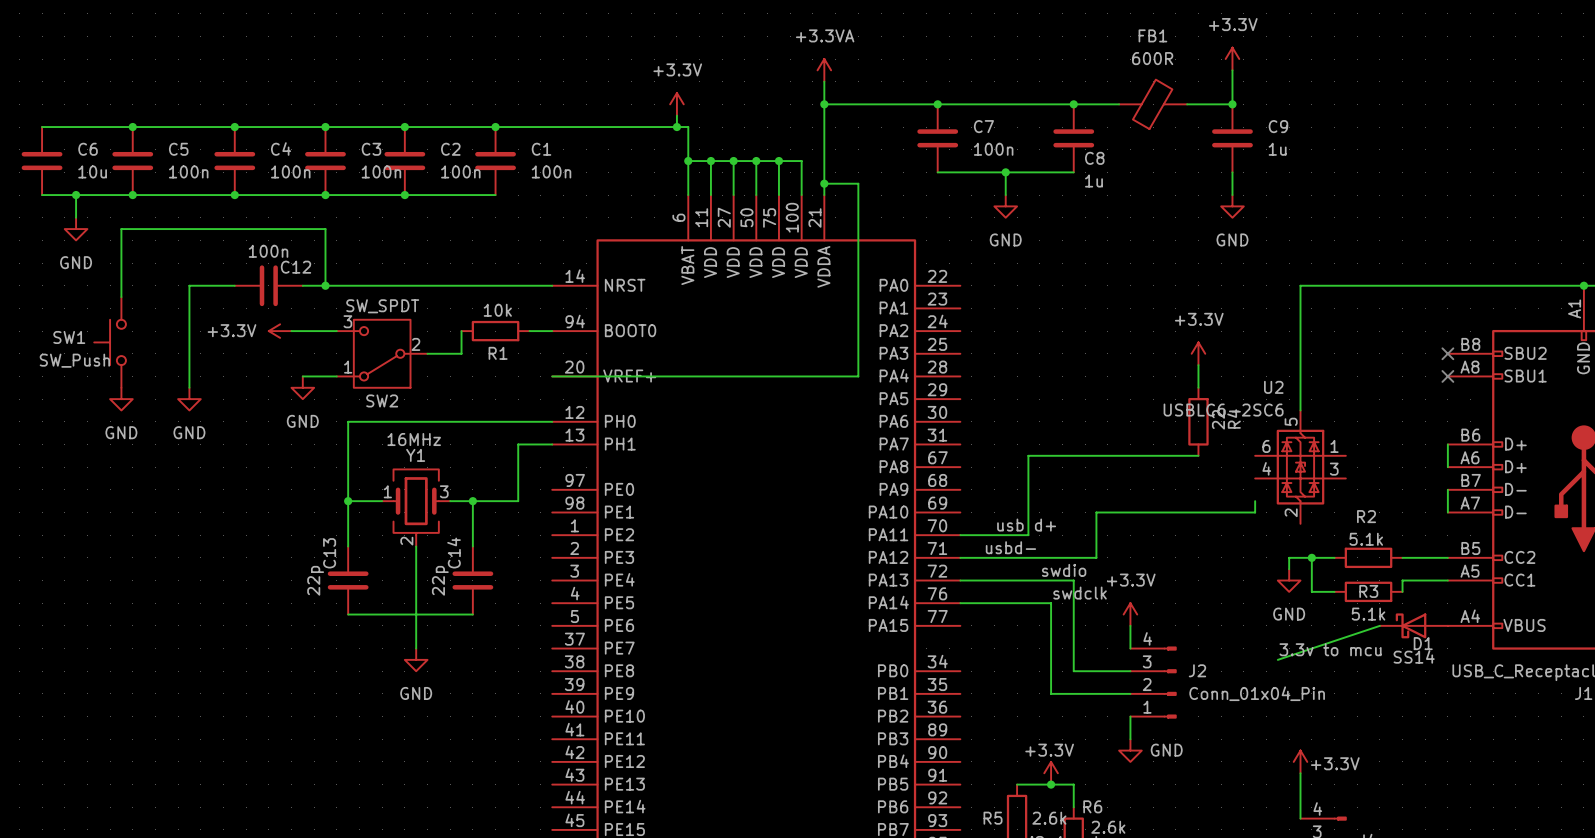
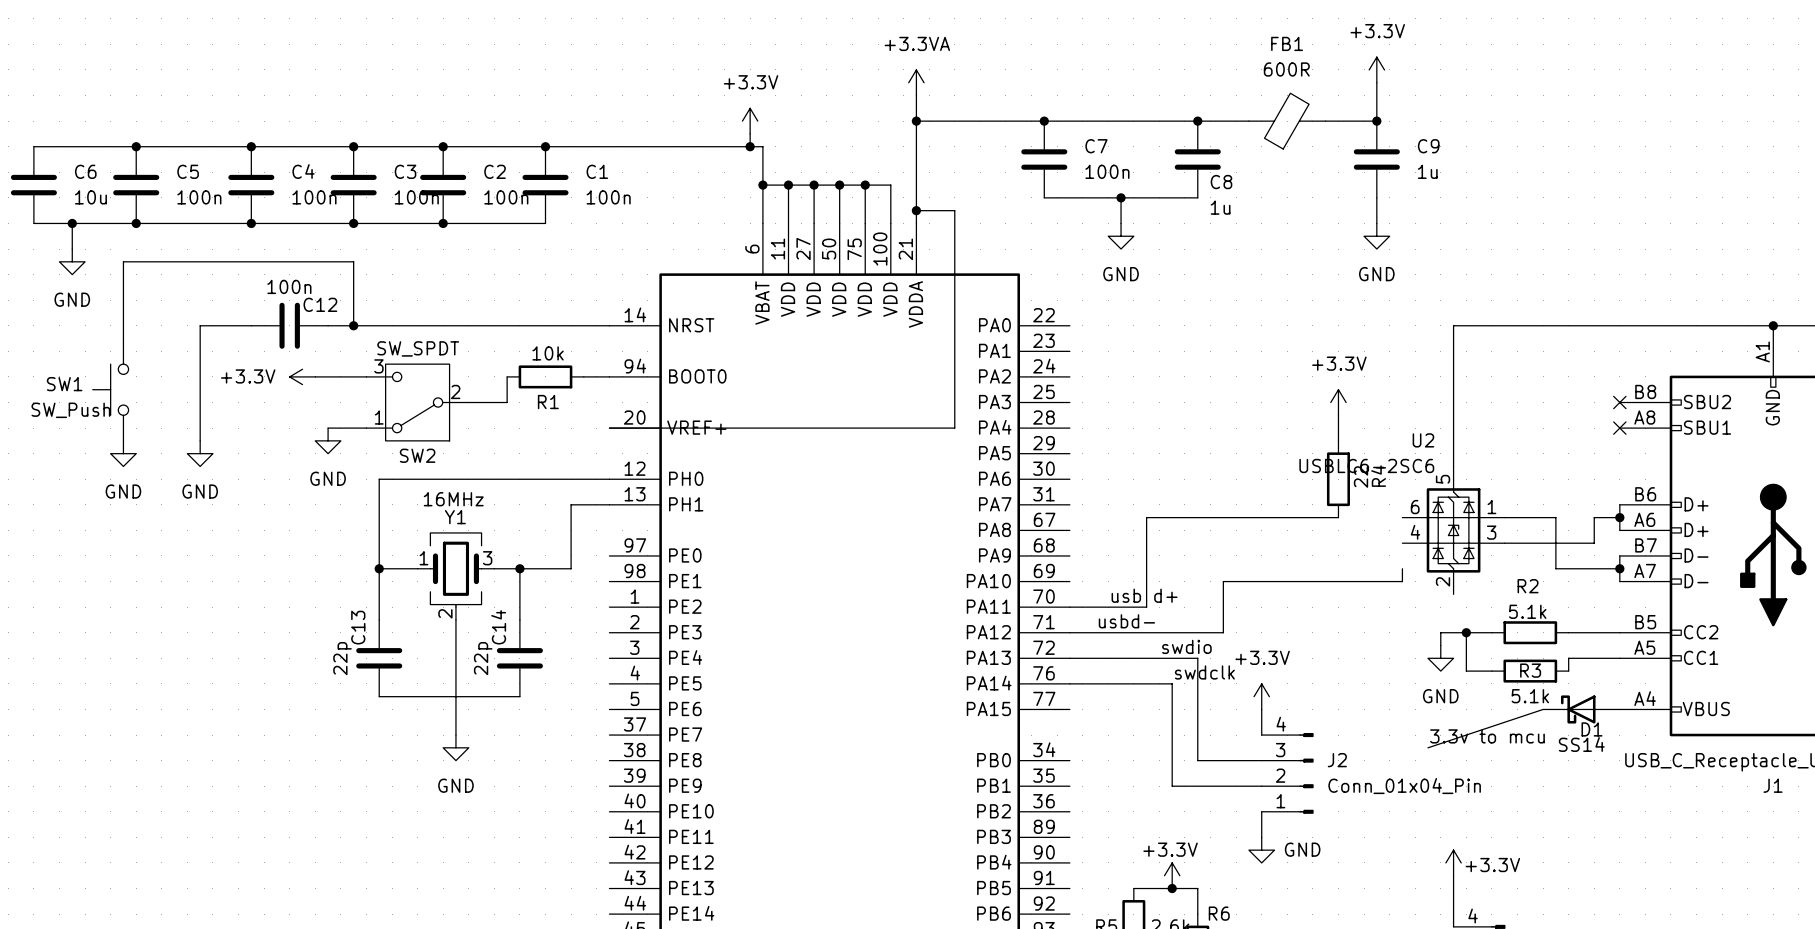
wire: none -> (1504, 517) (1555, 517) (1555, 568) (1619, 568)
wire: none -> (1619, 517) (1594, 517) (1594, 543) (1504, 543)
junction: none -> (1619, 517)
junction: none -> (1619, 568)

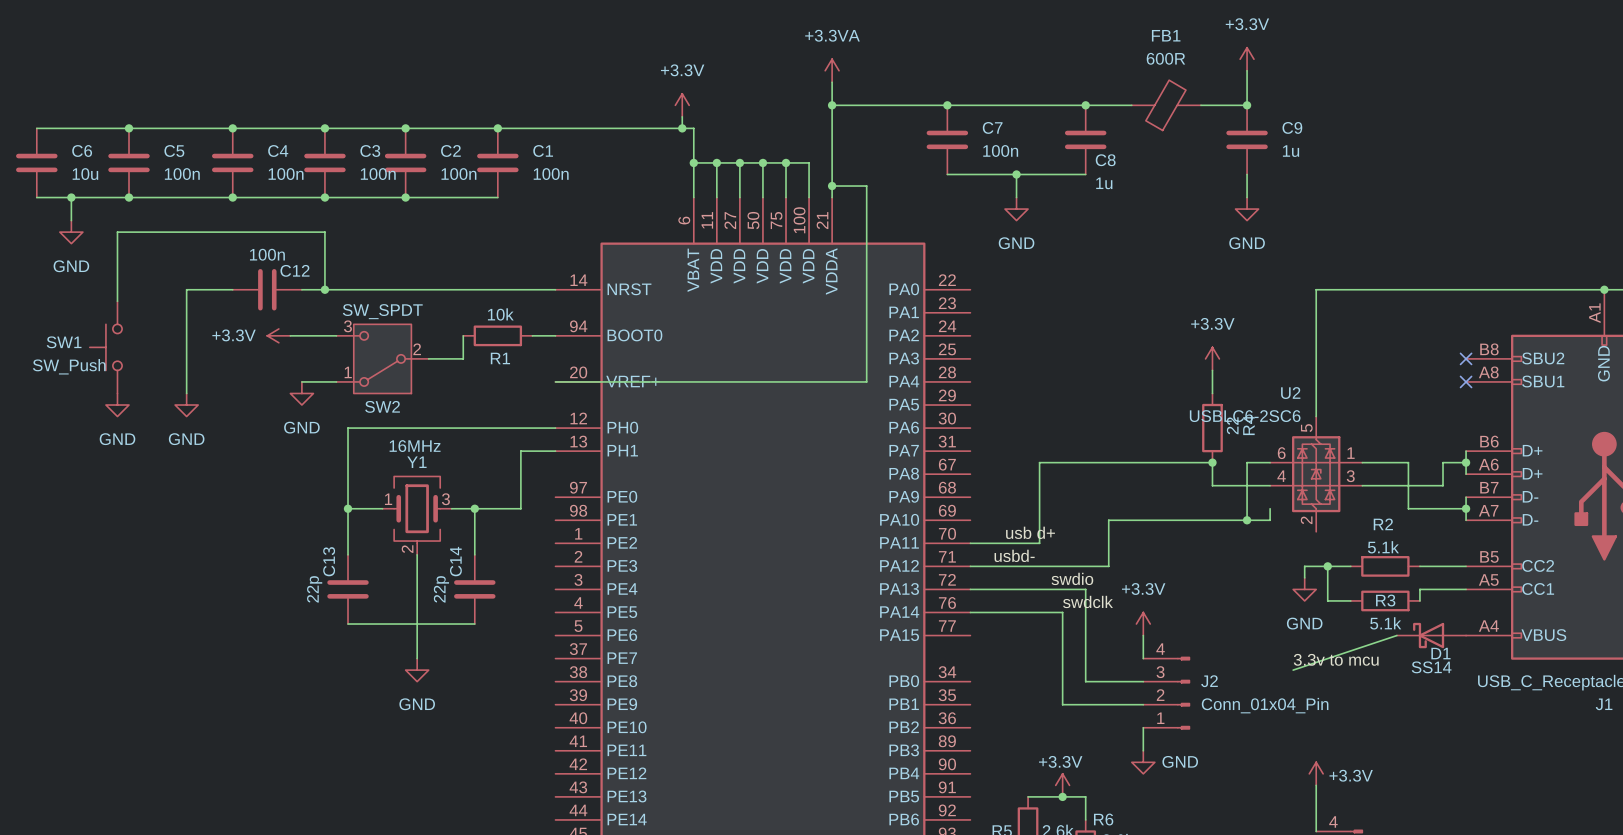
wire: none -> (1212, 462) (1212, 485) (1270, 485)
junction: none -> (1212, 462)
wire: none -> (1270, 462) (1247, 462) (1247, 520)
junction: none -> (1247, 520)

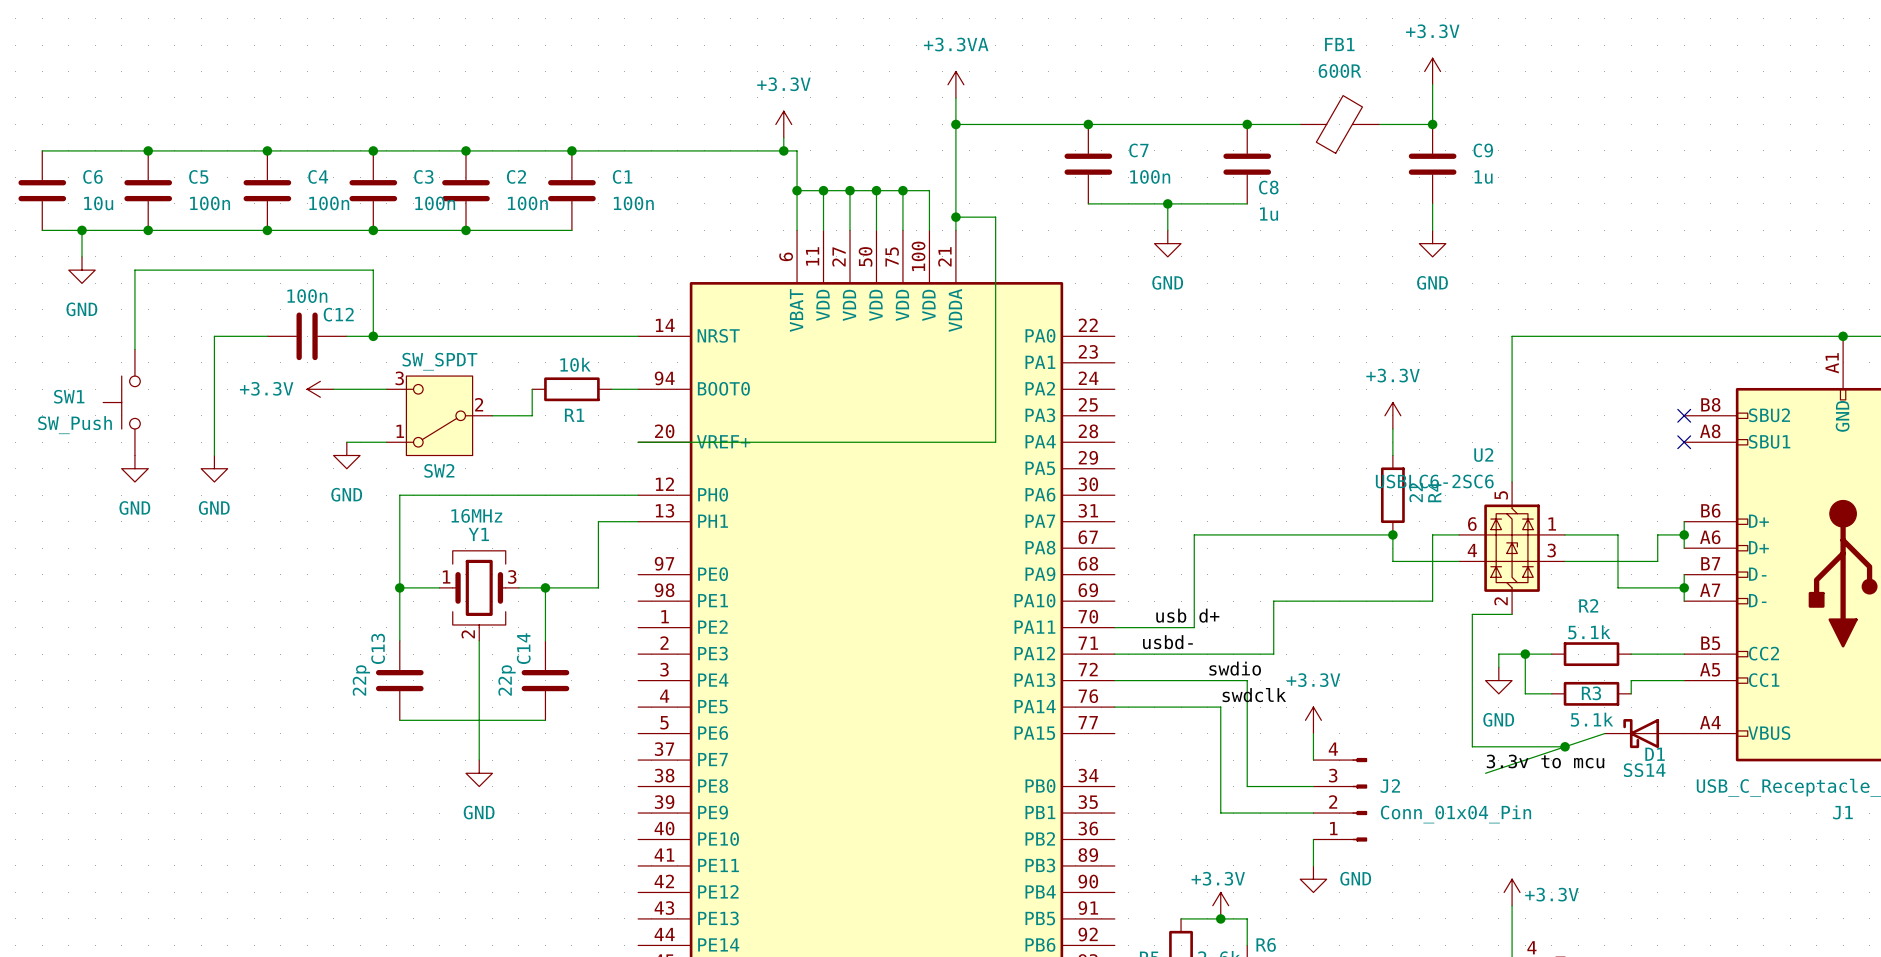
wire: (1270, 508) (1270, 520) (1247, 520) -> none
junction: (1247, 520) -> none
wire: none -> (1512, 614) (1472, 614) (1472, 746) (1565, 746)
junction: none -> (1565, 746)

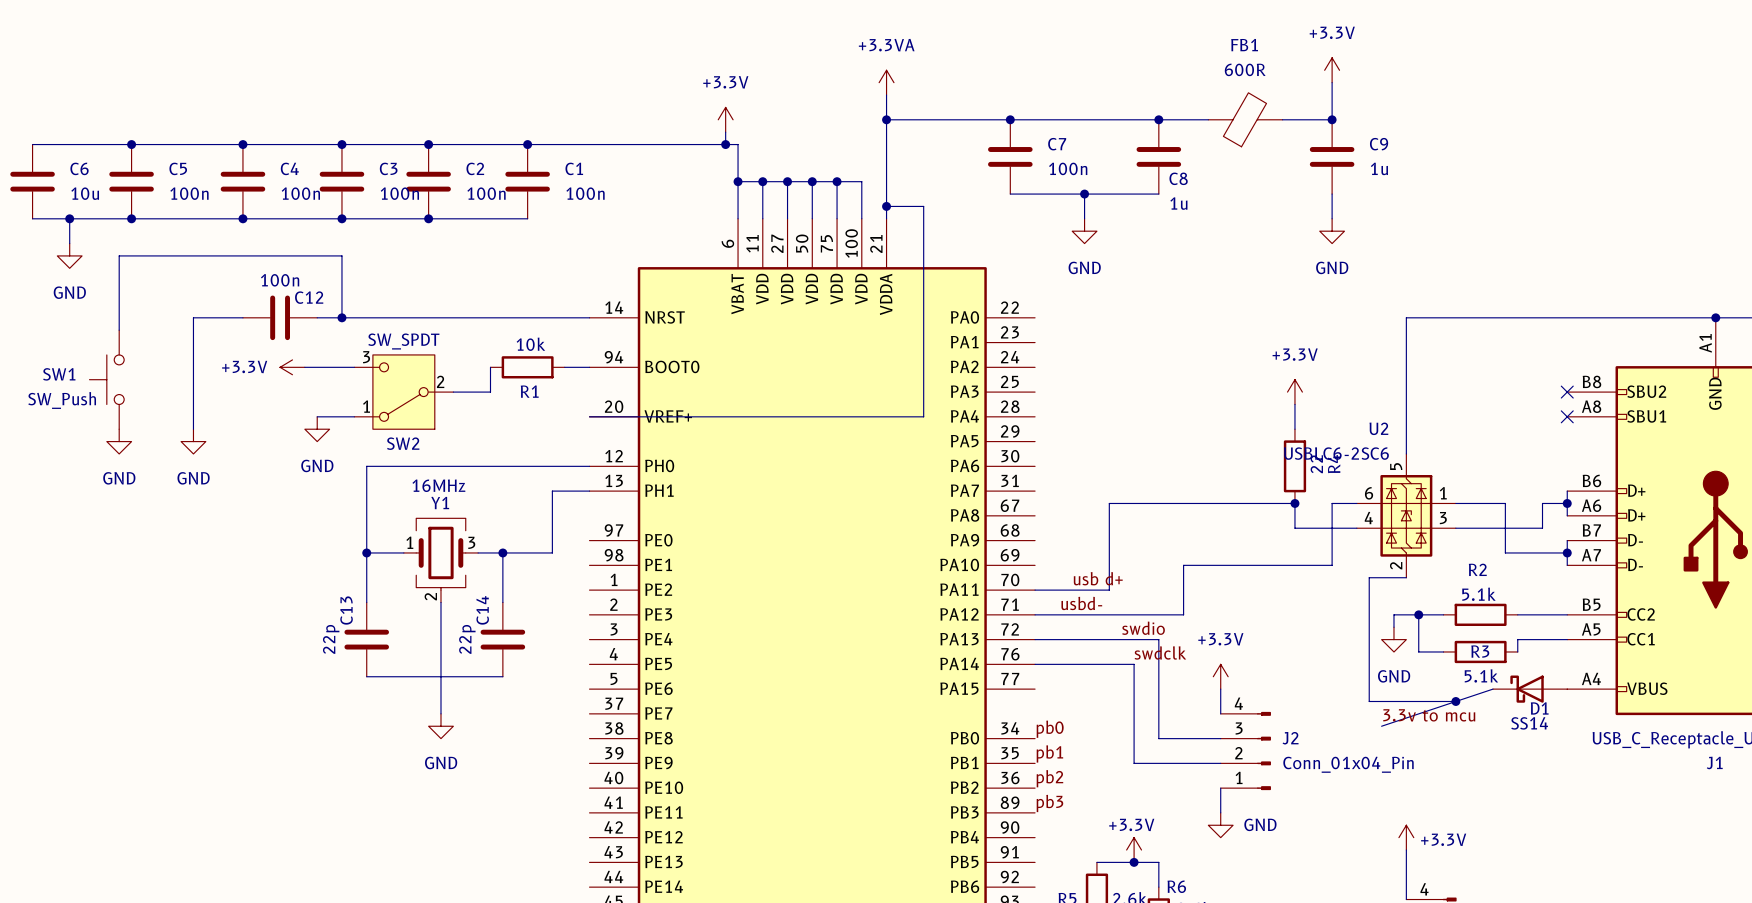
label: none -> pb0 (1050, 729)
label: none -> pb1 (1049, 753)
label: none -> pb2 (1049, 778)
label: none -> pb3 (1049, 803)

